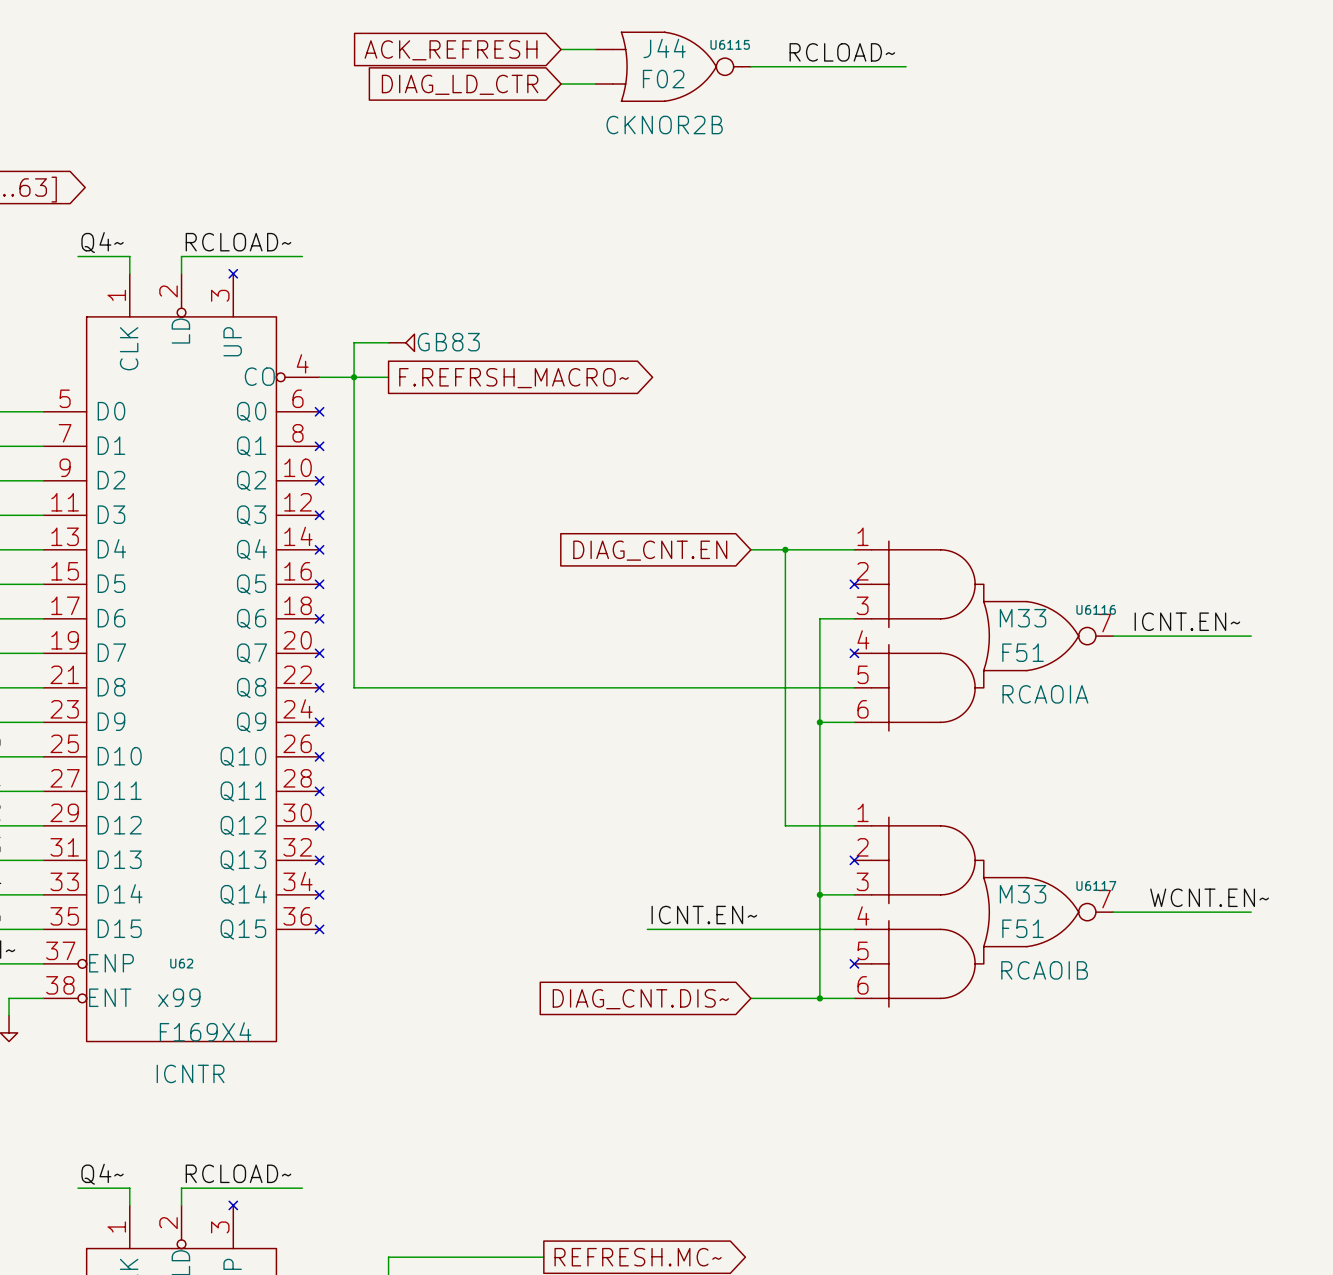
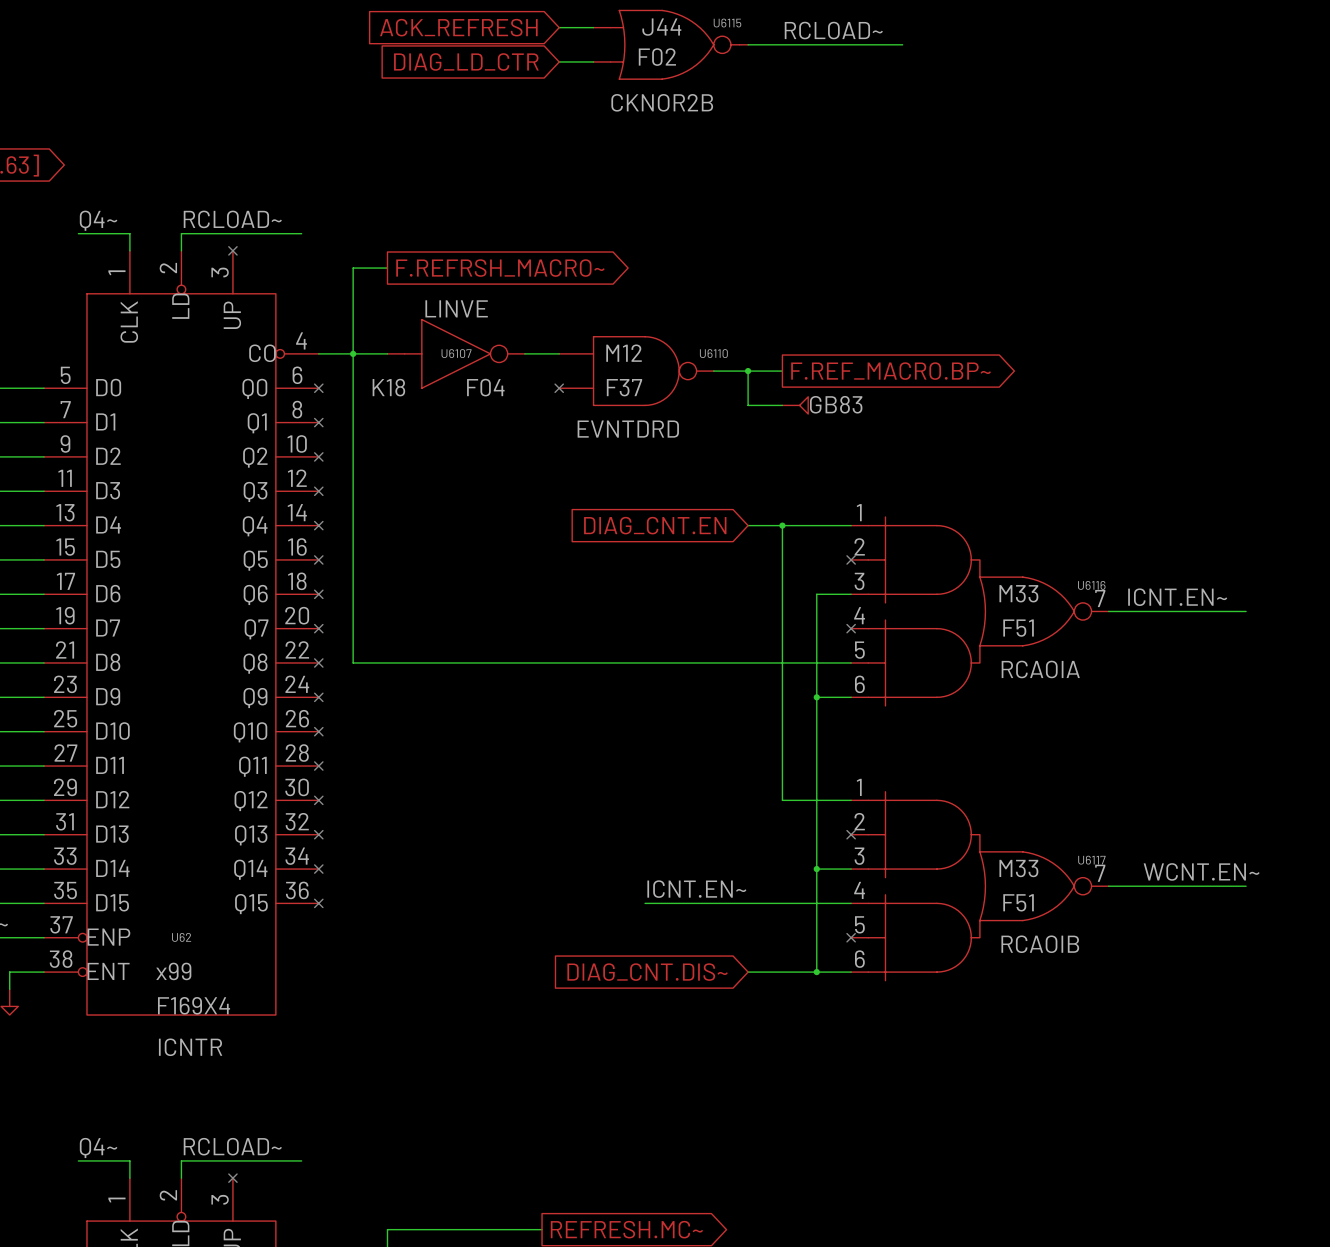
wire: (354, 342) (388, 342) -> (353, 319) (353, 268) (387, 268)
GB83 position: (401, 342) -> (795, 405)
U6107: none -> F04 (456, 353)
wire: none -> (524, 353) (559, 353)
global label position: F.REFRSH_MACRO~ (514, 378) -> F.REFRSH_MACRO~ (500, 268)
U6110: none -> F37 (636, 371)
wire: none -> (713, 371) (782, 371)
wire: none -> (748, 371) (748, 405) (782, 405)
junction: none -> (748, 371)
global label: none -> F.REF_MACRO.BP~ (891, 371)
no-connect mark: none -> (559, 388)

